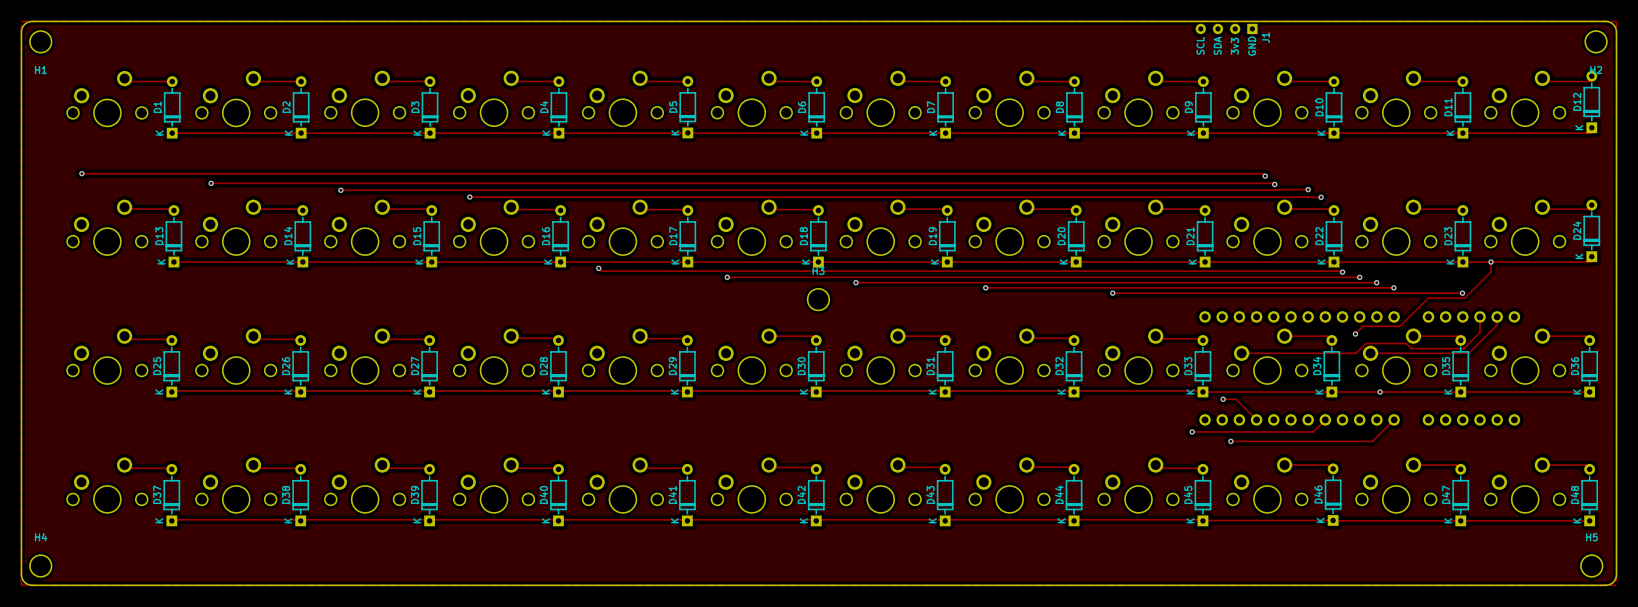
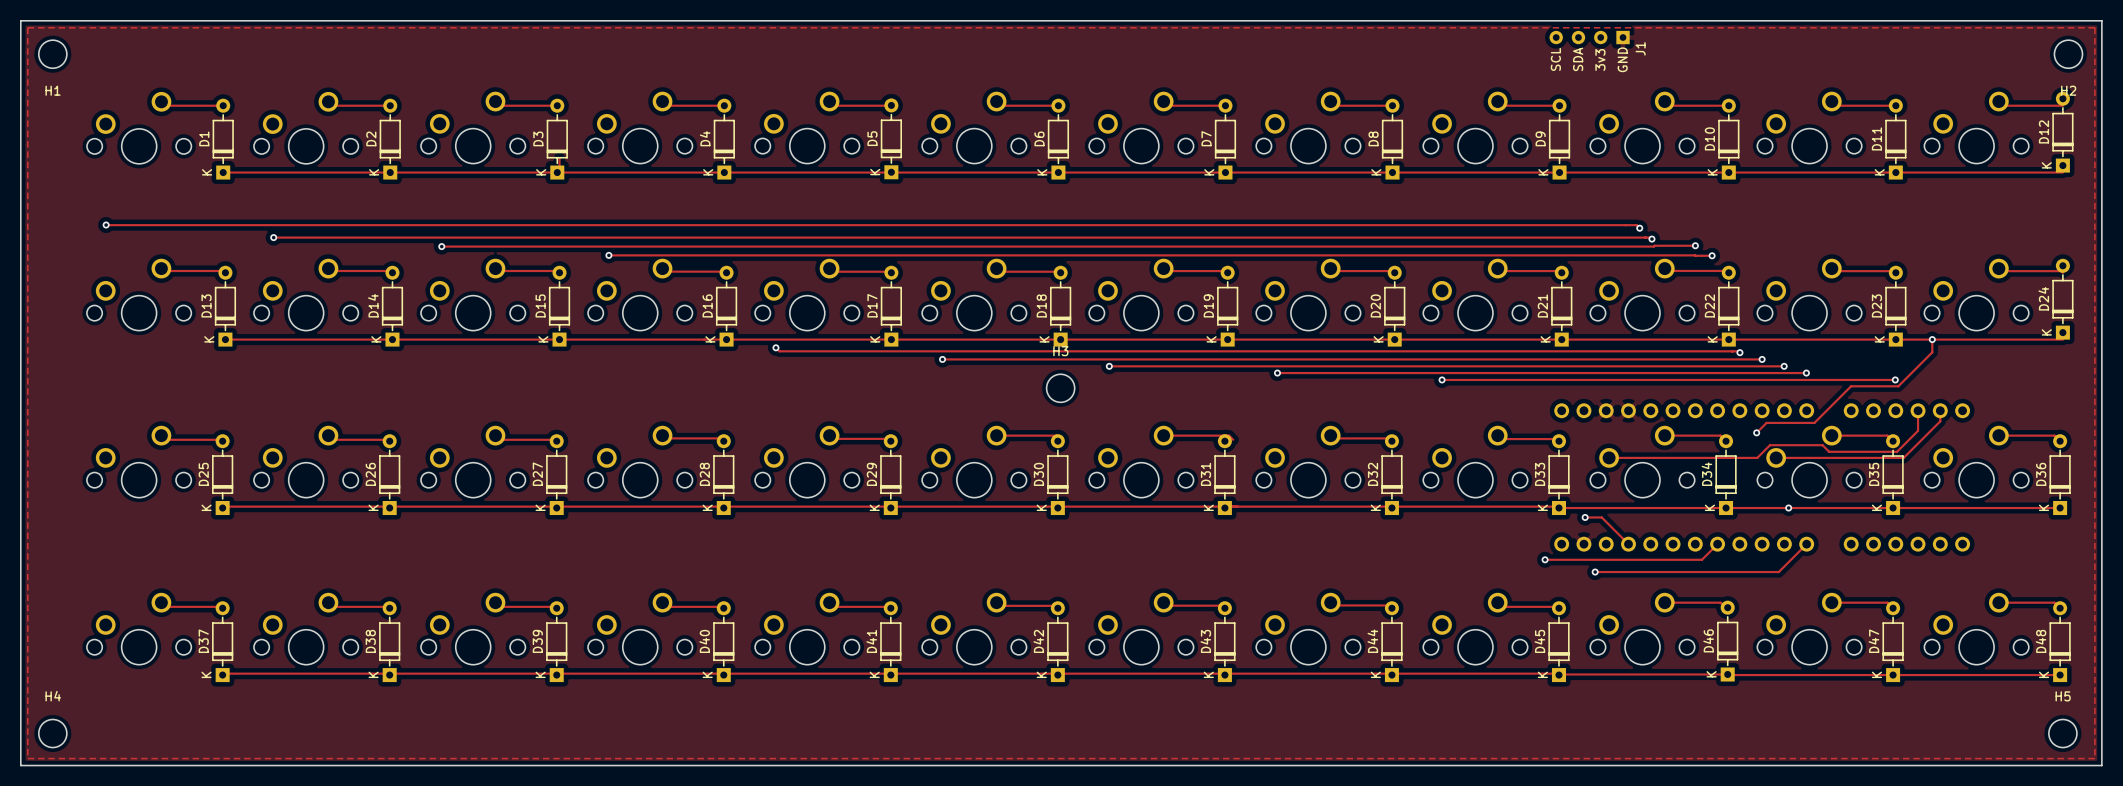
board edge: (32, 21) (1609, 22) (1615, 26) (1616, 32) (1615, 578) (1611, 583) (1605, 585) (28, 584) (22, 579) (21, 574) (21, 32) (24, 24) (32, 21) -> (20, 20) (20, 765) (2101, 765) (2101, 20) (20, 20)

